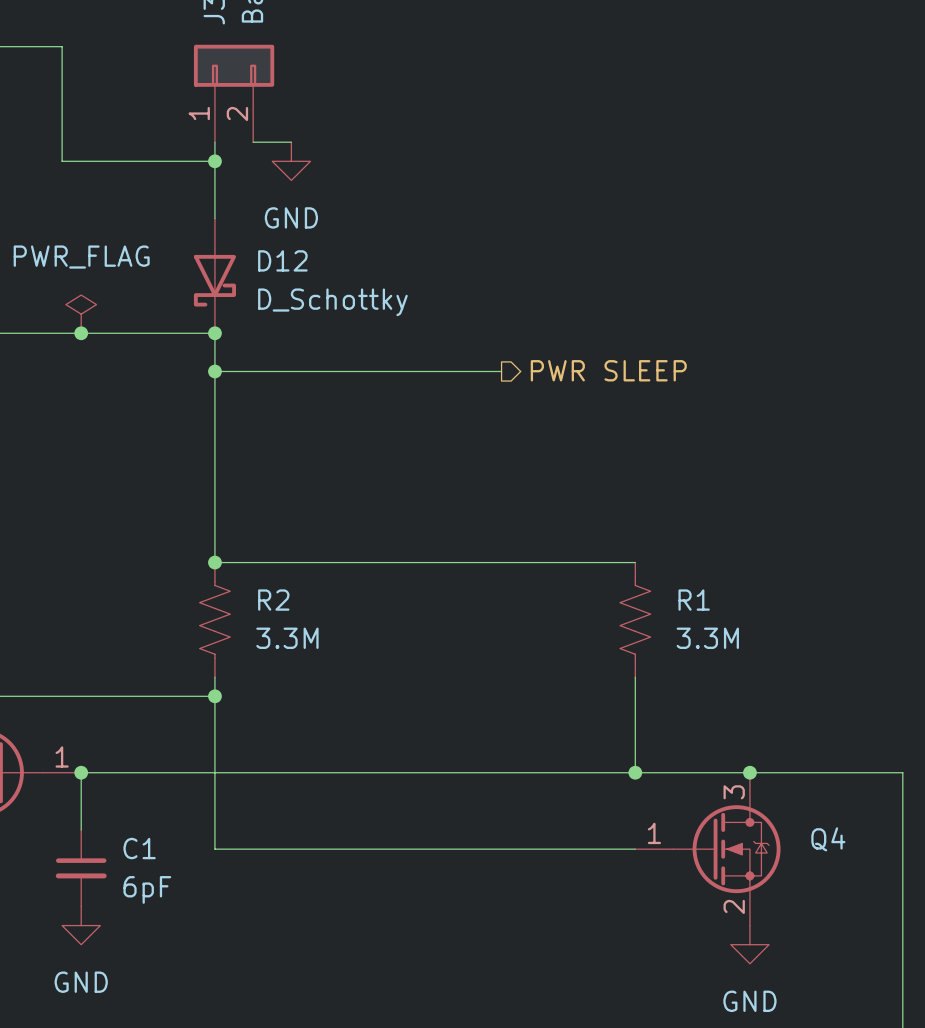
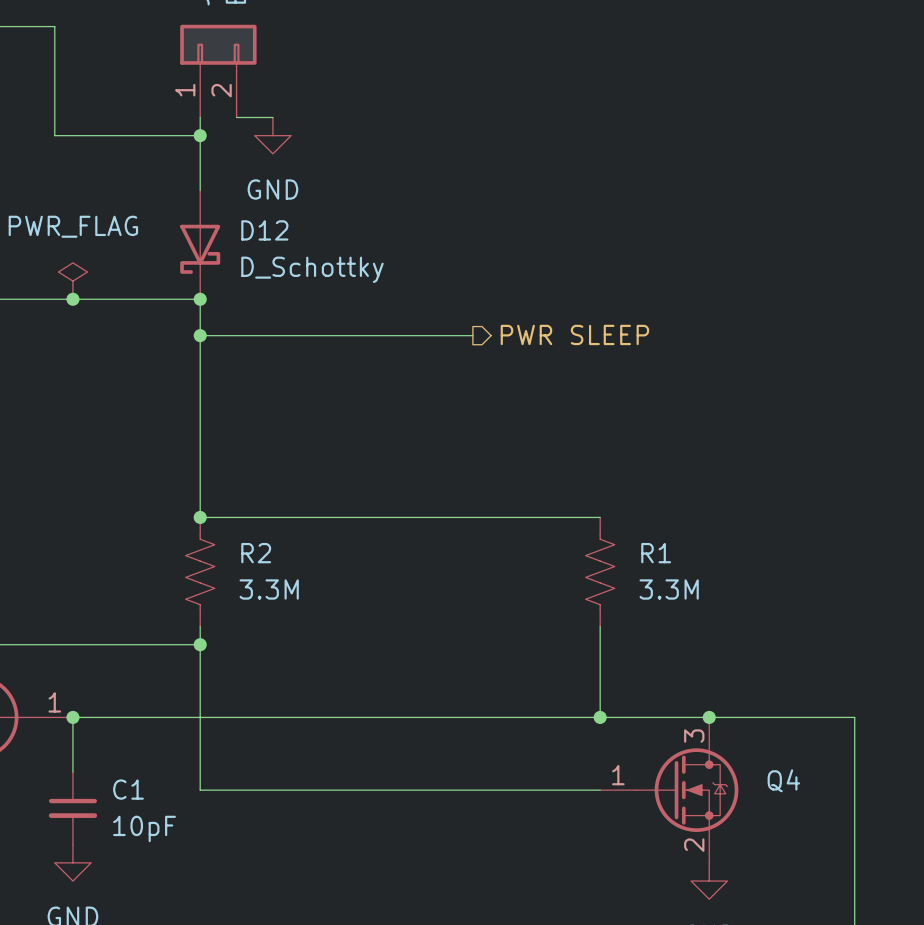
C1 value: 6pF (147, 889) -> 10pF (144, 828)

